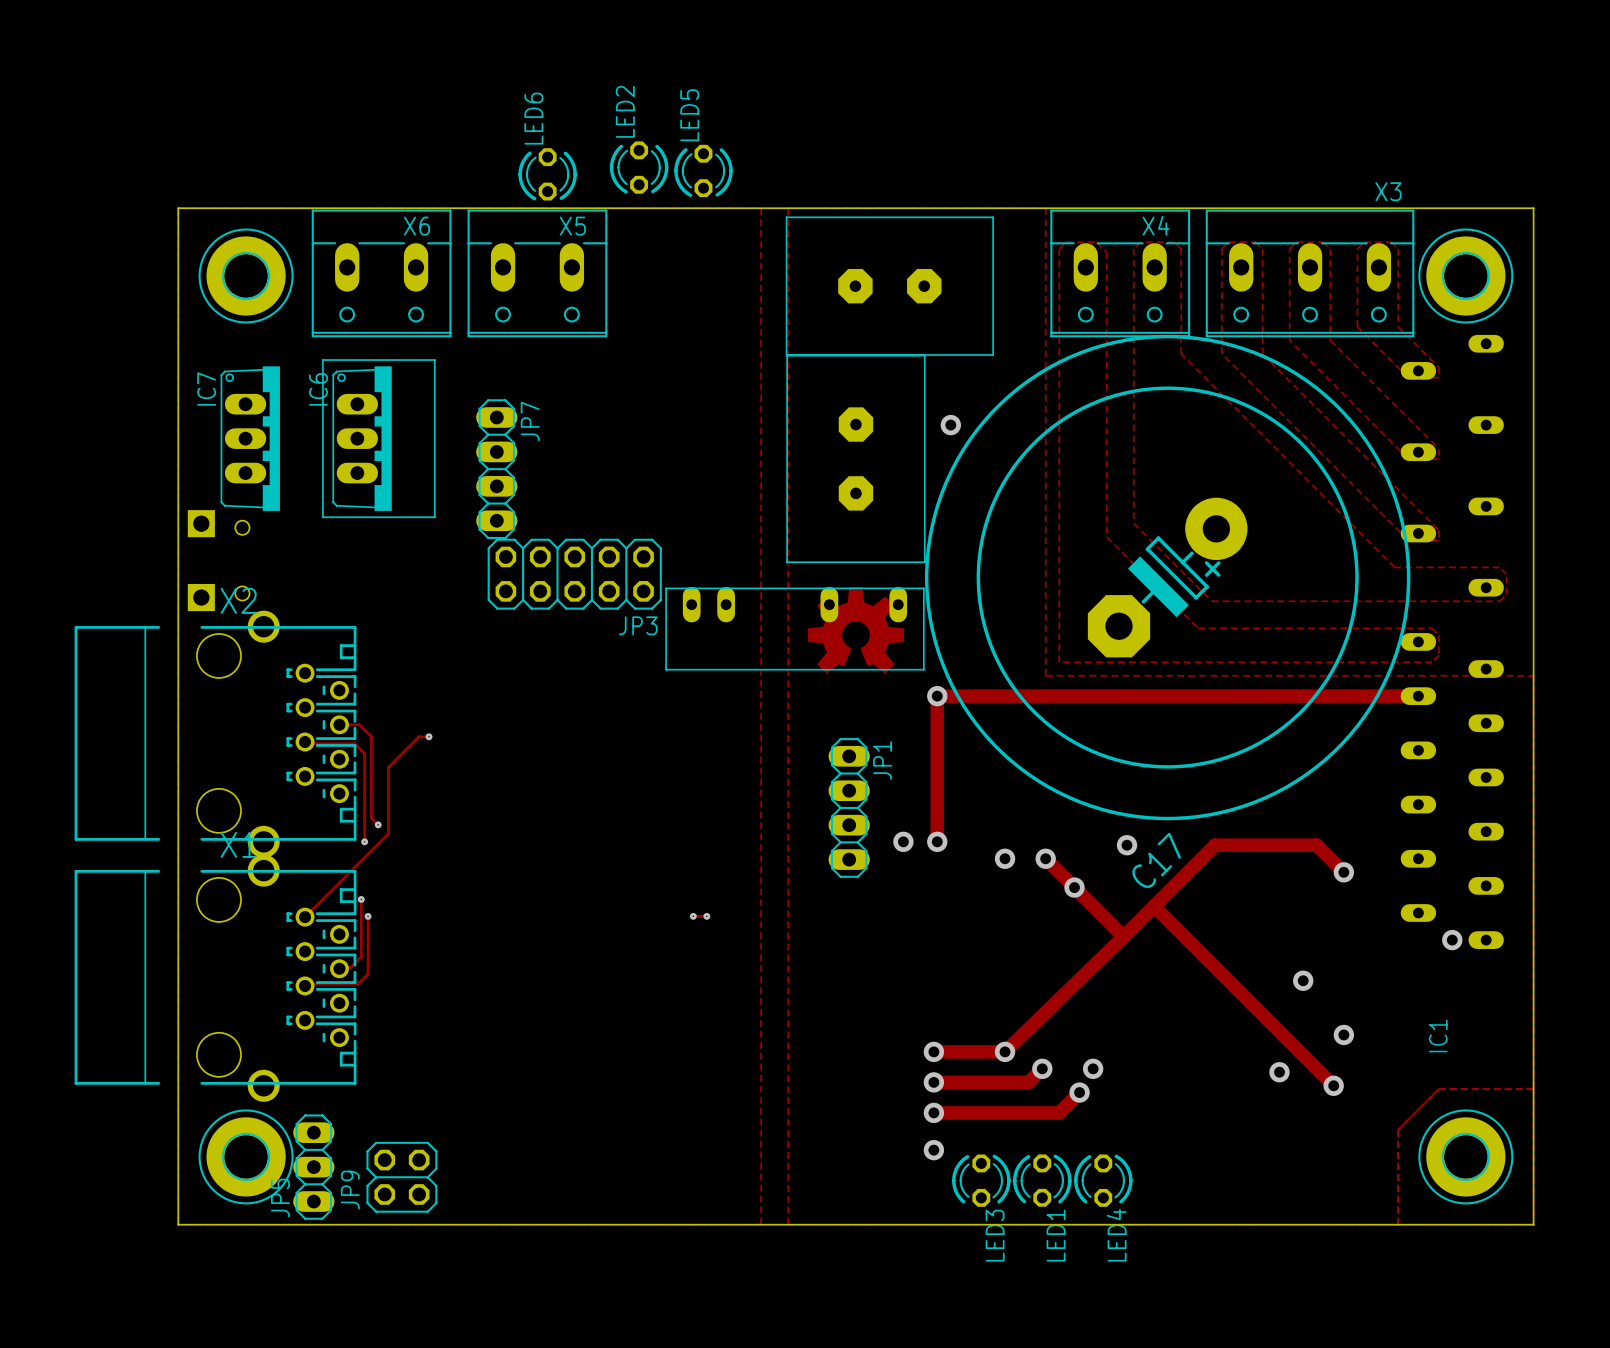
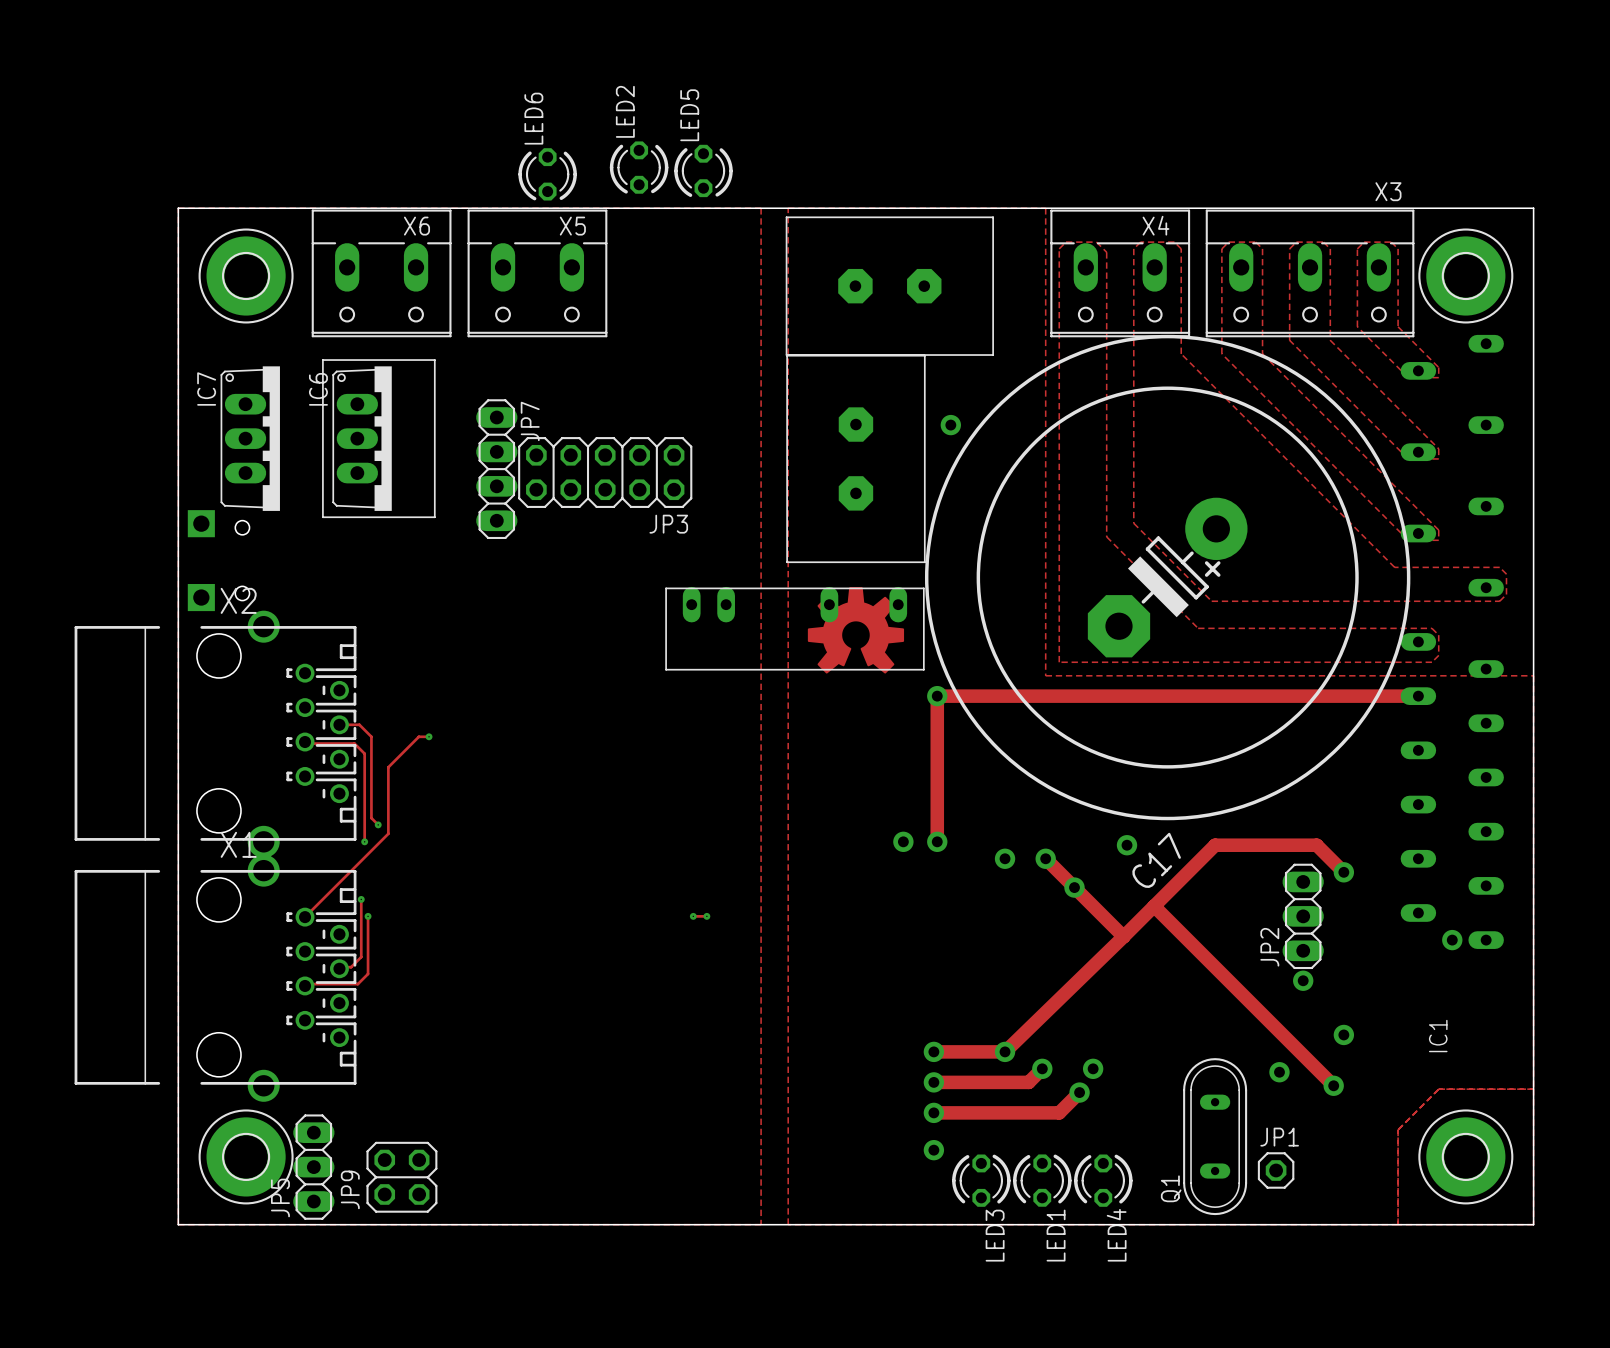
JP3 position: (574, 574) -> (605, 472)
JP1 footprint: [828, 738, 870, 878] -> [1257, 1152, 1295, 1189]
JP1 name position: JP1 (882, 760) -> JP1 (1279, 1137)
JP2: none -> (1303, 916)
Q1: none -> (1215, 1136)

